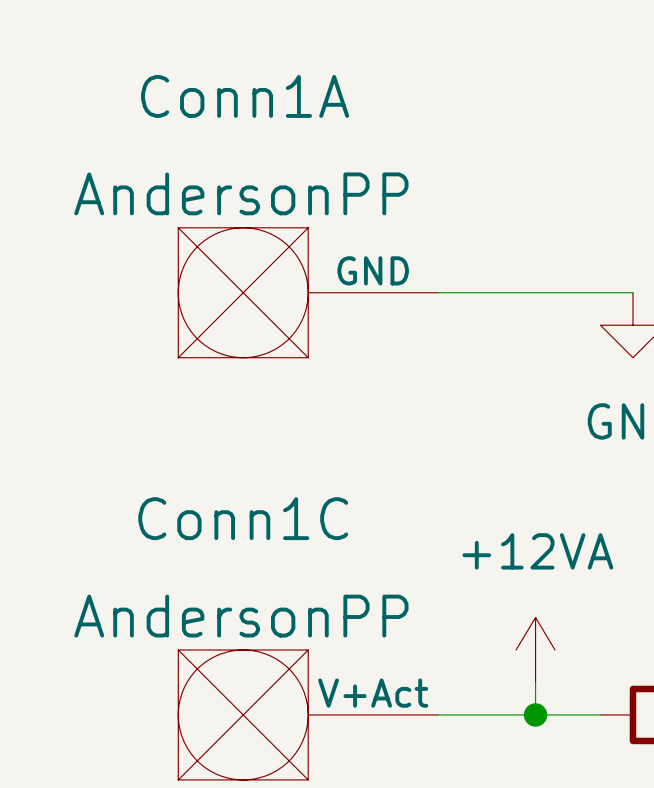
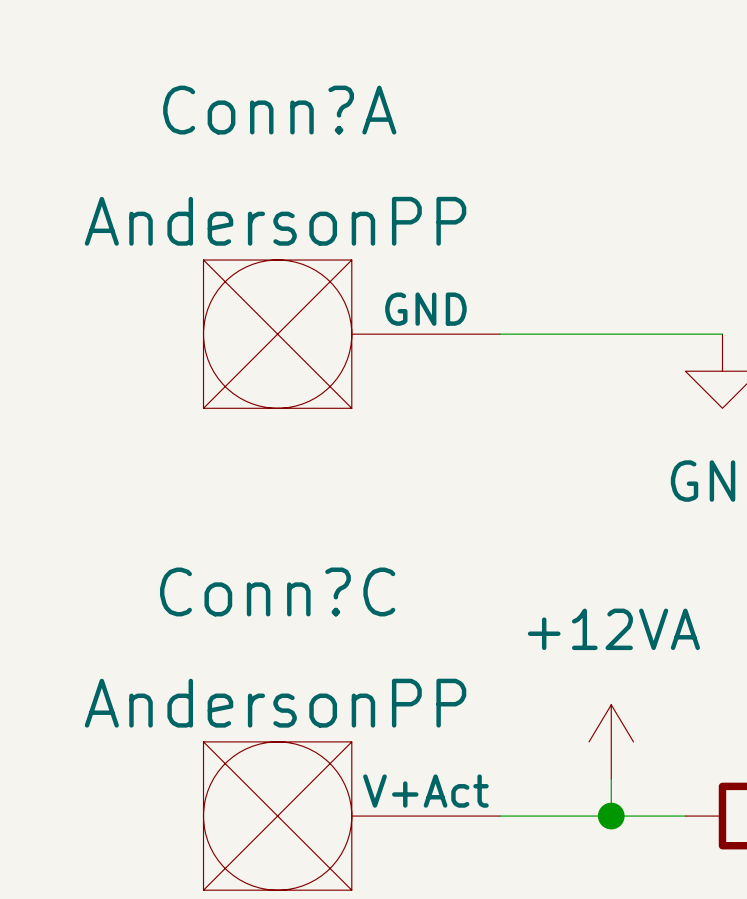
Conn1A name: Conn1A (245, 96) -> Conn?A (279, 110)
Conn1C name: Conn1C (243, 518) -> Conn?C (277, 591)

